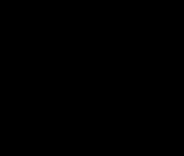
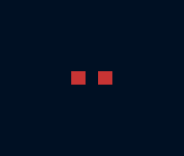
part: none -> (91, 77)

